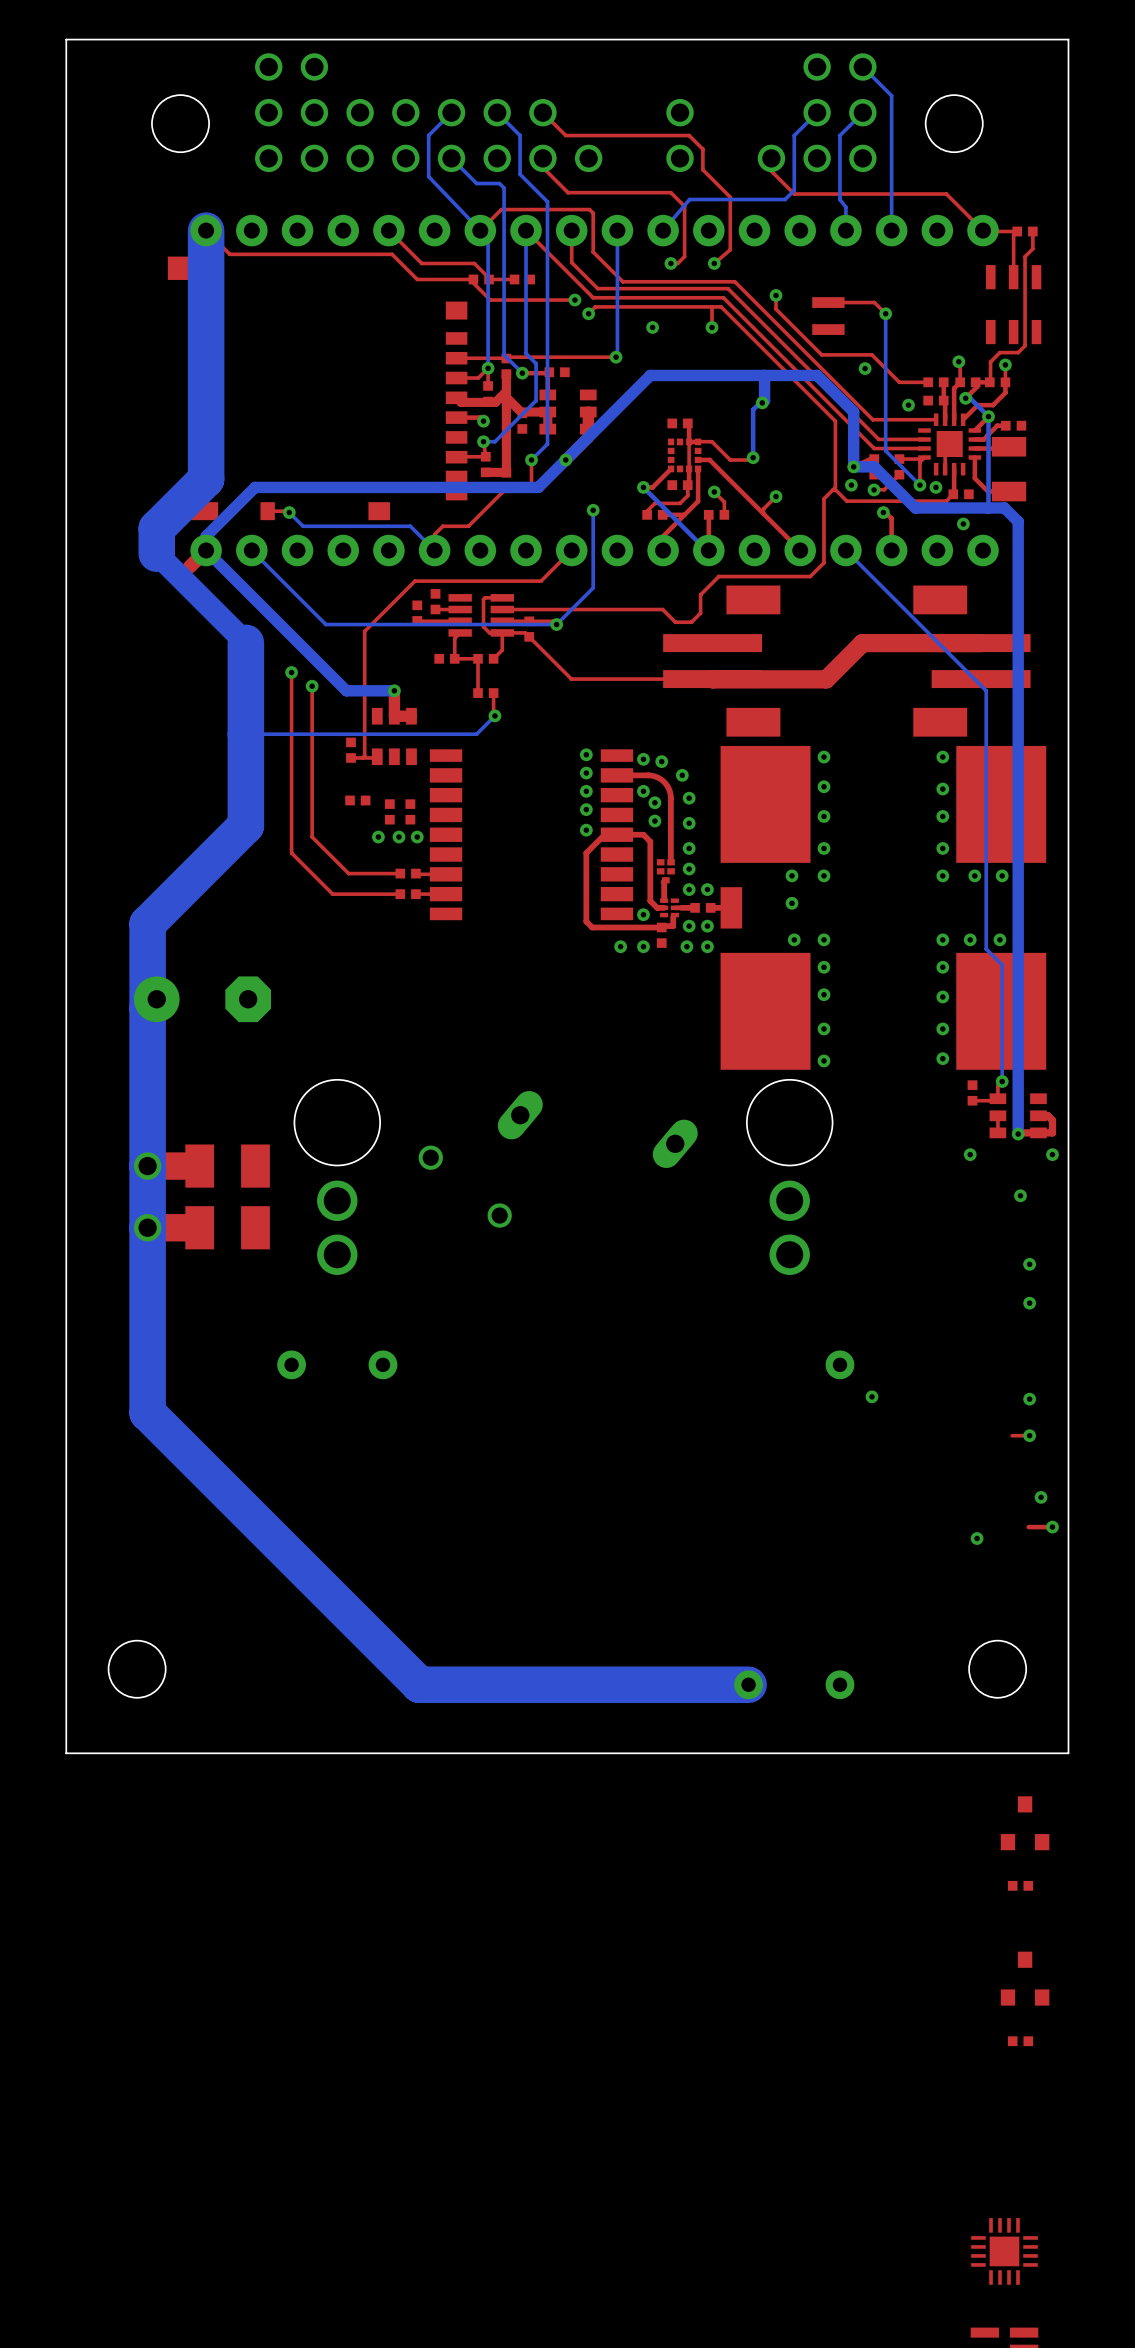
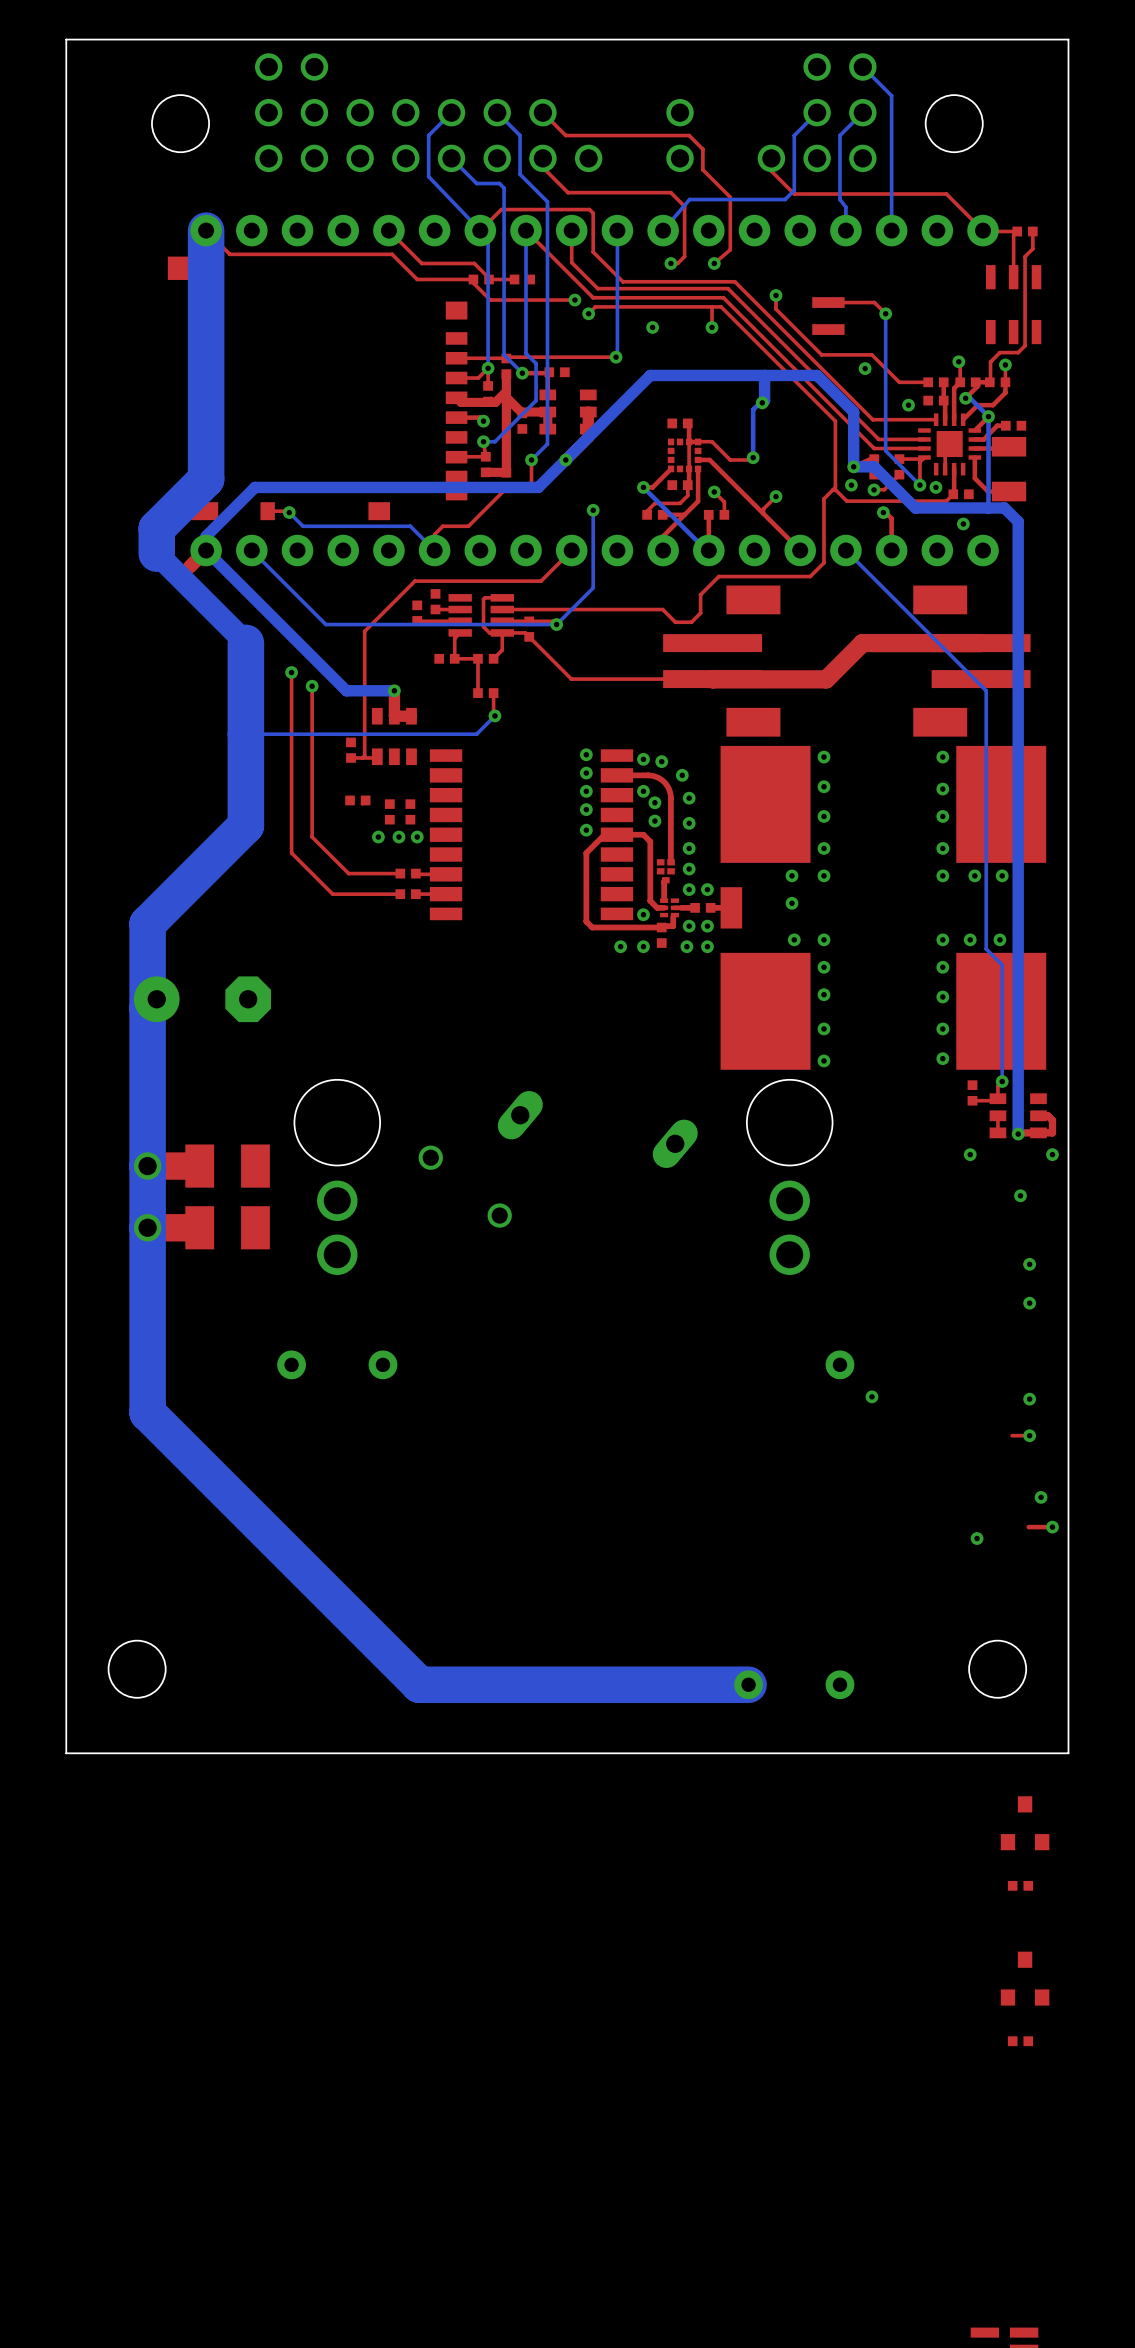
part: (1004, 2251) -> none

